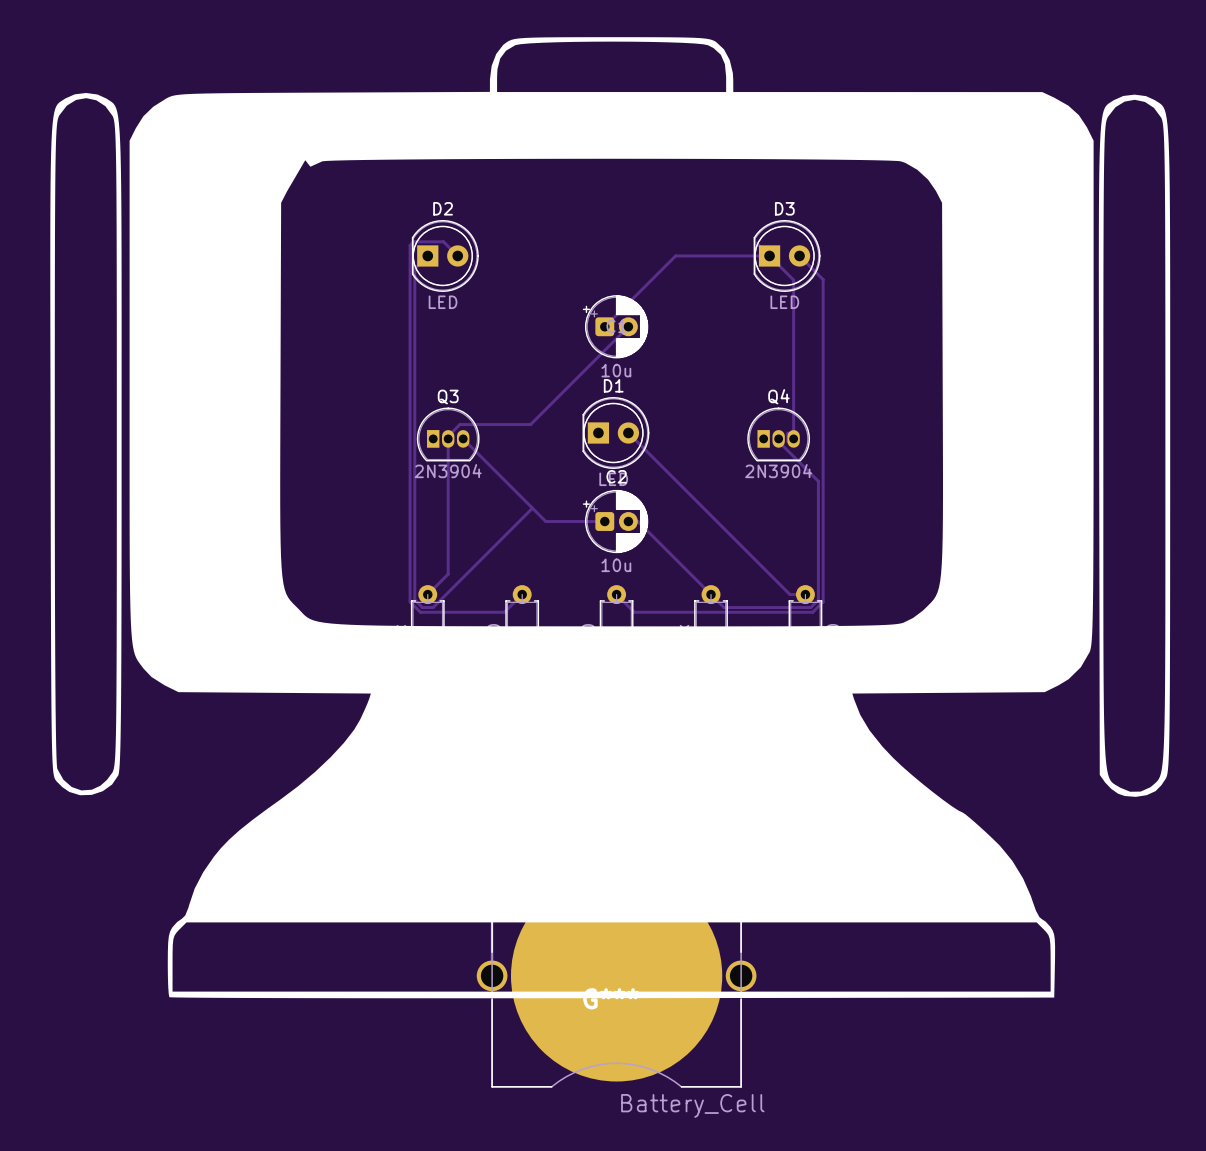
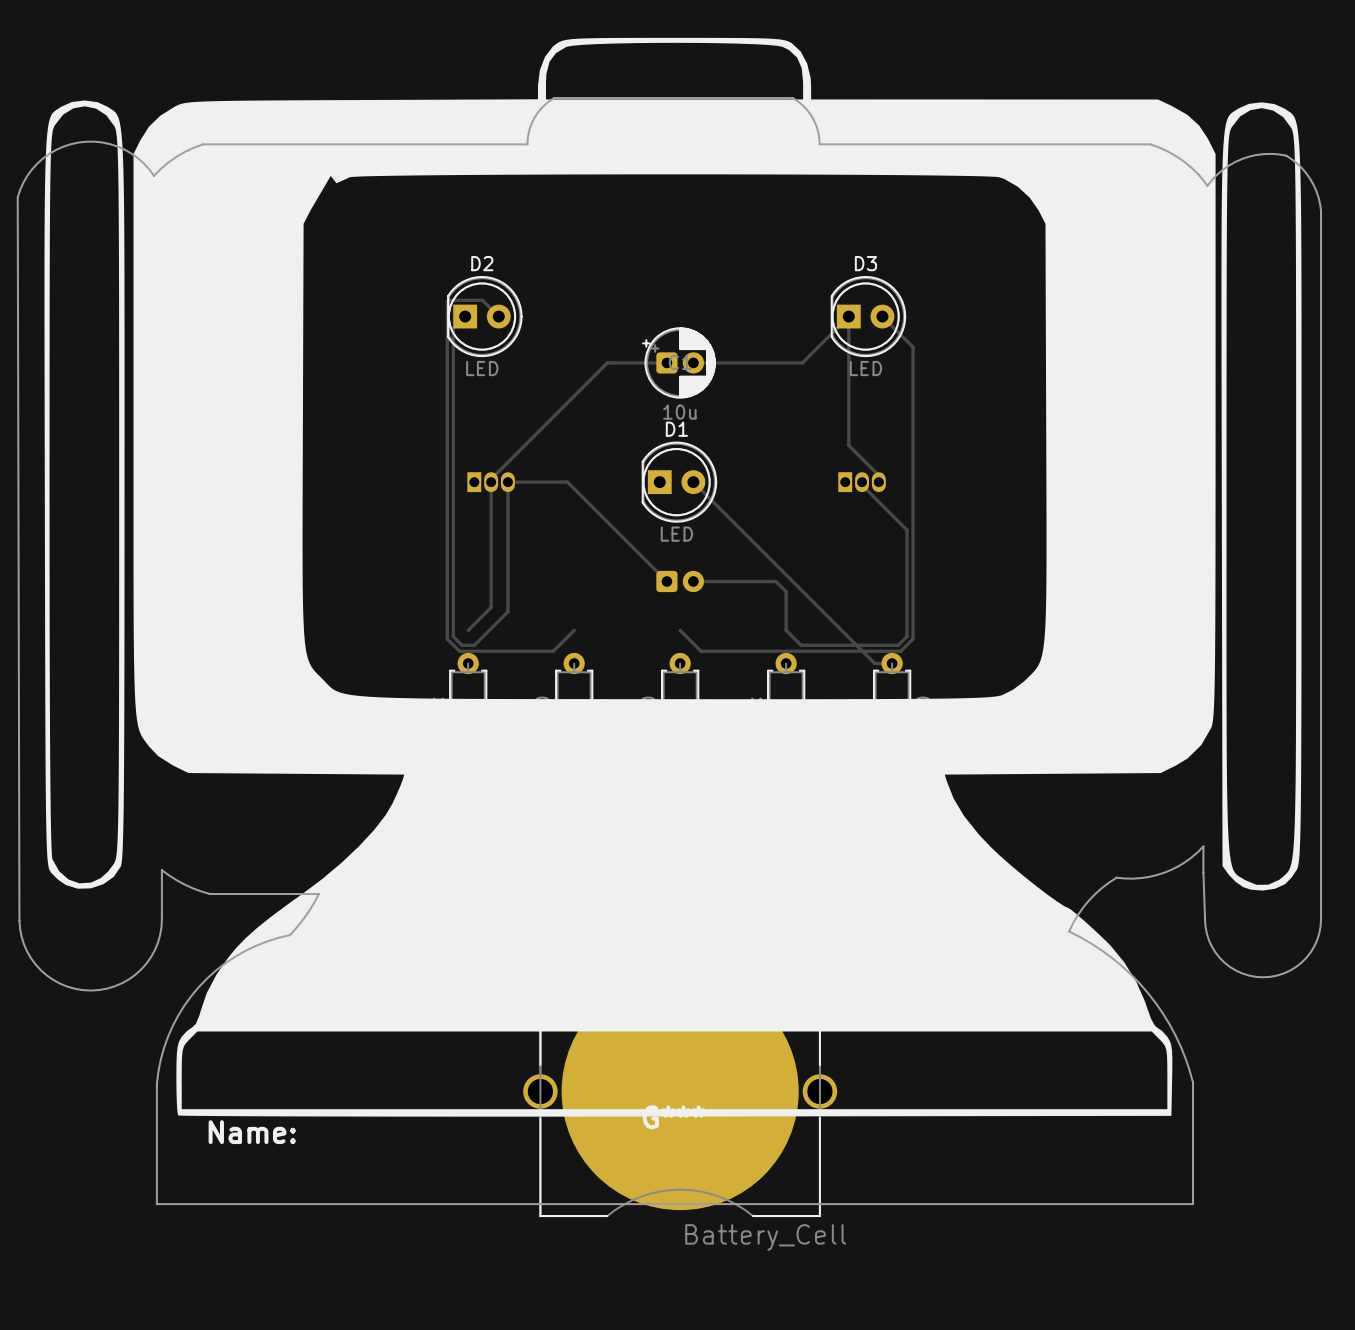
board edge: none -> (203, 144) (176, 156) (153, 175) (138, 158) (117, 146) (94, 141) (71, 144) (56, 149) (37, 163) (27, 175) (17, 197) (19, 920) (23, 944) (35, 964) (53, 980) (75, 988) (99, 990) (114, 986) (128, 979) (141, 969) (154, 950) (161, 927) (161, 870) (184, 884) (209, 894) (318, 894) (305, 915) (289, 935) (255, 945) (225, 963) (198, 987) (177, 1016) (163, 1048) (156, 1083) (156, 1204) (1193, 1204) (1193, 1082) (1180, 1046) (1155, 1003) (1130, 974) (1101, 950) (1069, 931) (1088, 900) (1116, 877) (1140, 878) (1163, 872) (1185, 862) (1203, 846) (1206, 933) (1215, 952) (1230, 967) (1242, 973) (1256, 976) (1270, 976) (1283, 973) (1295, 967) (1306, 957) (1314, 946) (1319, 933) (1321, 919) (1321, 210) (1316, 191) (1302, 168) (1286, 155) (1256, 154) (1228, 165) (1207, 185) (1184, 162) (1168, 151) (1150, 144) (819, 144) (818, 133) (812, 117) (805, 108) (792, 97) (554, 97) (545, 104) (534, 117) (528, 133) (527, 144) (203, 144)
track: (756, 242) (793, 280) (793, 427) -> (693, 362) (802, 362) (848, 316) (848, 445) (878, 475)
track: (427, 255) (414, 268) (414, 599) (422, 607) (433, 607) (532, 508) -> none
D2 position: (445, 255) -> (484, 316)
track: (457, 255) (443, 241) (413, 241) (410, 245) (410, 601) (420, 612) (504, 612) (522, 594) -> none
track: (769, 255) (675, 255) (604, 326) -> none
D3 position: (787, 255) -> (868, 316)
track: (799, 255) (823, 279) (823, 601) (812, 612) (634, 612) (616, 594) -> none
track: none -> (498, 316) (482, 300) (448, 300) (447, 301) (447, 639) (459, 651) (553, 651) (574, 630)
track: none -> (882, 316) (912, 347) (912, 639) (900, 651) (701, 651) (680, 630)
track: (628, 326) (530, 424) (459, 424) (448, 436) -> (666, 362) (607, 362) (491, 479) (491, 485)
track: (787, 432) (787, 441) -> none
Q3 side: top (448, 434) -> bottom (491, 482)
Q4 side: top (778, 434) -> bottom (862, 482)
track: (463, 438) (545, 521) (604, 521) -> (465, 316) (453, 328) (453, 636) (462, 645) (474, 645) (507, 611) (507, 482) (567, 482) (666, 581)
track: (778, 438) (778, 441) (818, 481) (818, 599) (810, 607) (724, 607) (637, 521) -> (862, 482) (862, 485) (907, 530) (907, 636) (898, 645) (801, 645) (786, 630) (786, 591) (775, 581) (704, 581)
C2 side: top (615, 521) -> bottom (680, 581)
track: (448, 544) (448, 574) (427, 594) -> (491, 607) (468, 630)
text: none -> Name: (252, 1132)

